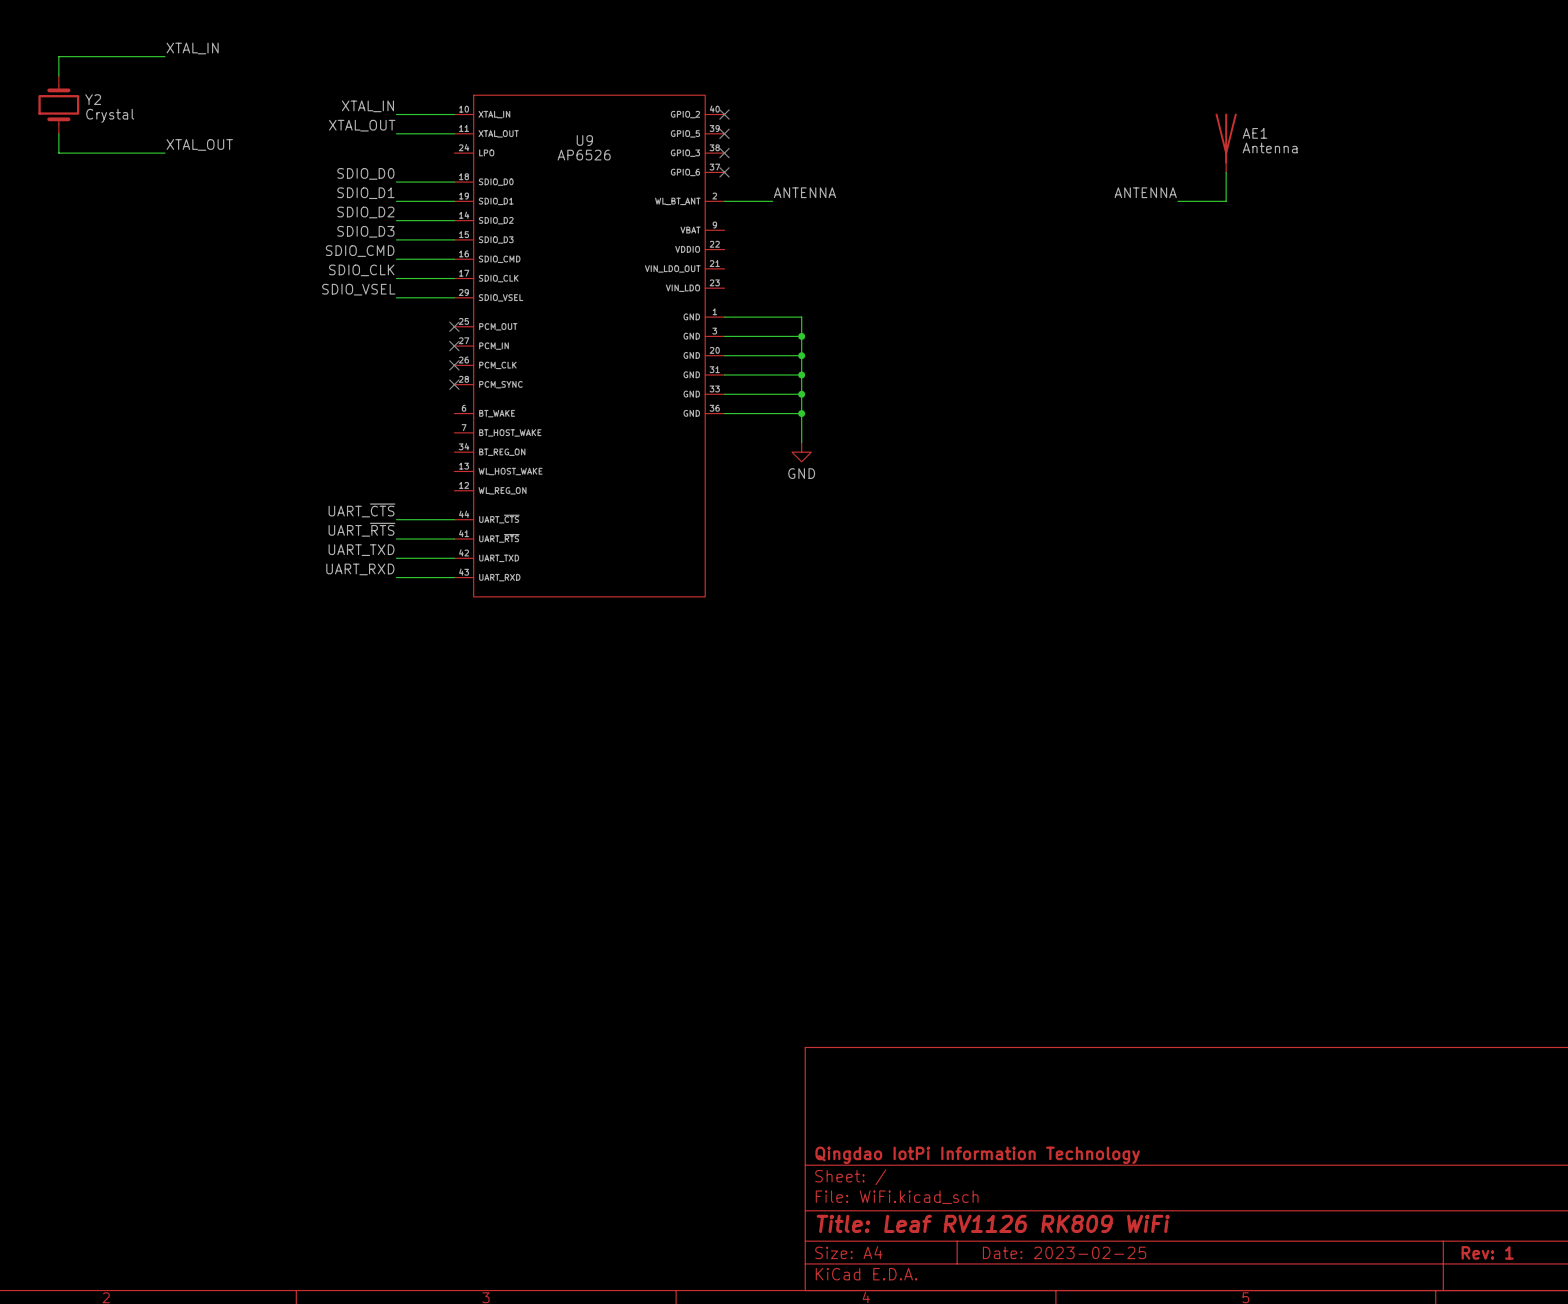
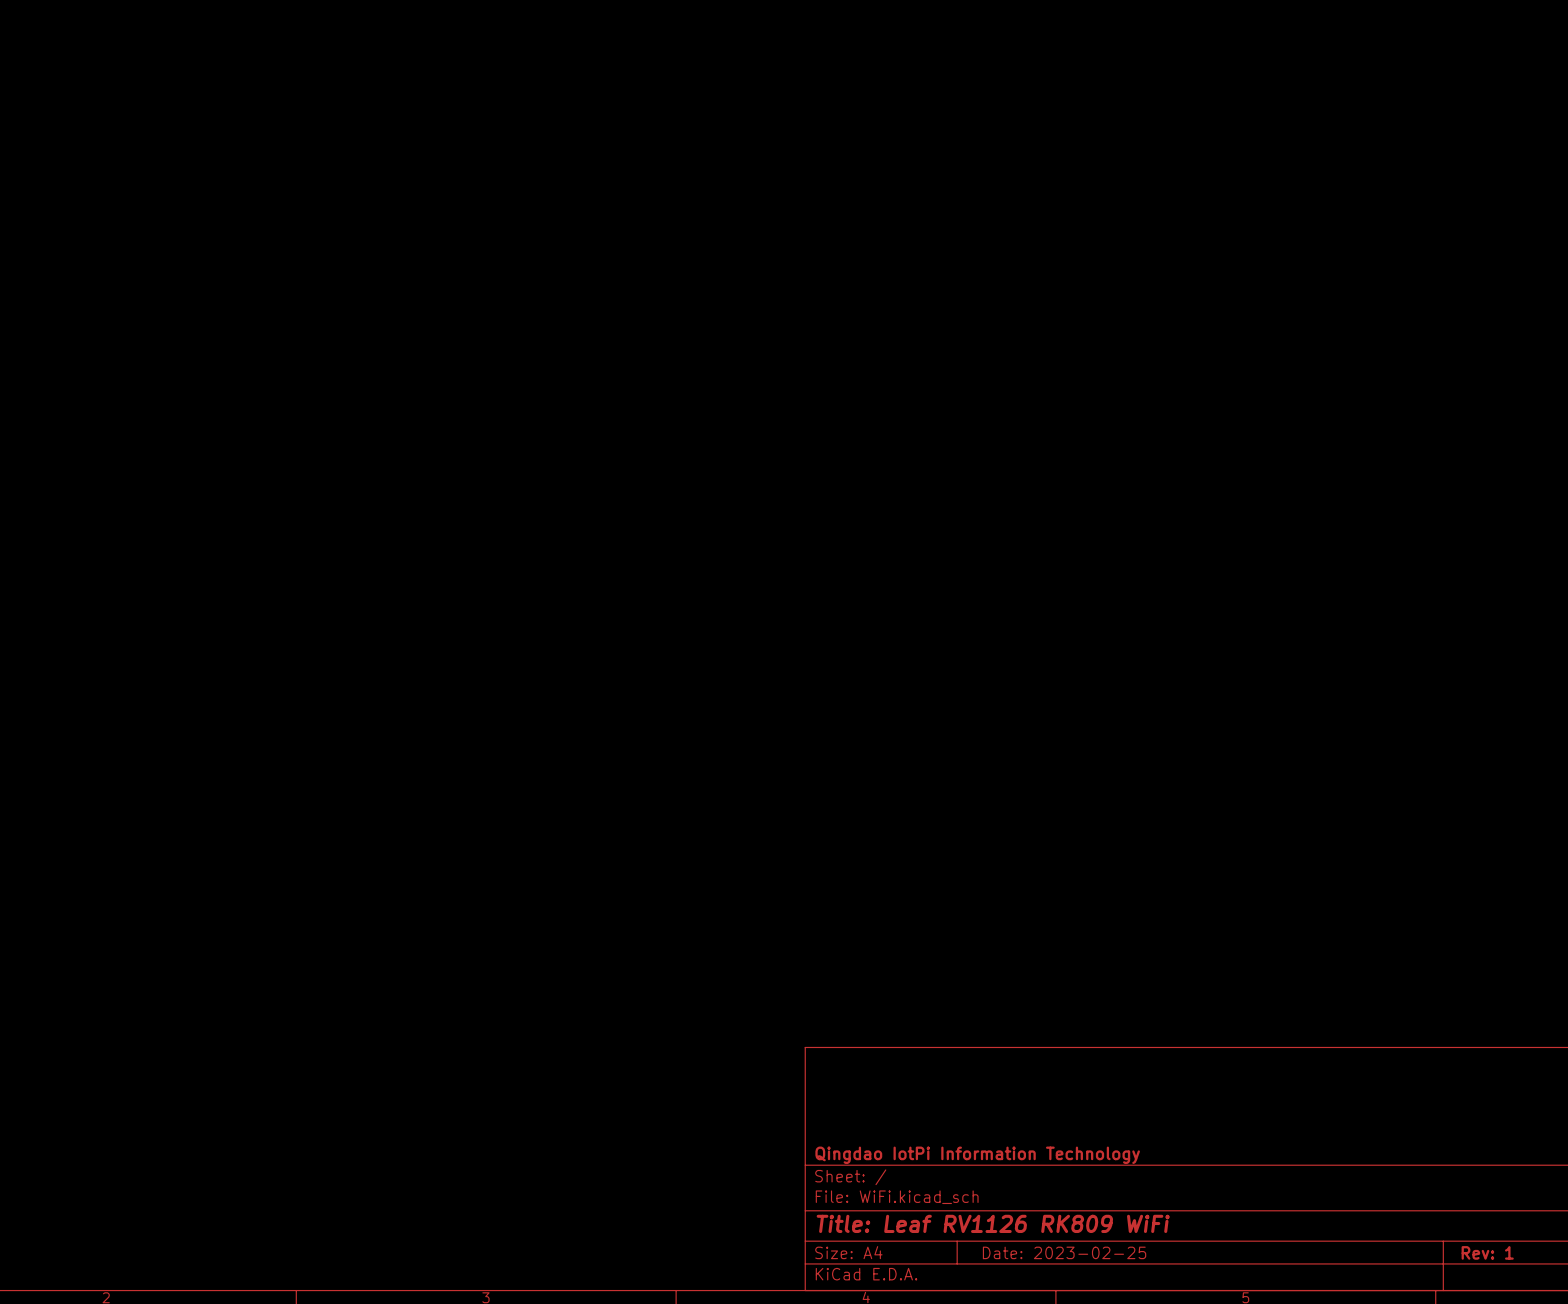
label: XTAL_IN (192, 48) -> none
wire: (164, 56) (58, 56) (58, 75) -> none
Y2: Crystal (58, 104) -> none
label: XTAL_IN (367, 106) -> none
wire: (396, 114) (454, 114) -> none
no-connect mark: (724, 114) -> none
label: XTAL_OUT (362, 125) -> none
wire: (58, 133) (58, 153) (164, 153) -> none
wire: (396, 133) (454, 133) -> none
no-connect mark: (724, 133) -> none
AE1: Antenna (1226, 142) -> none
label: XTAL_OUT (199, 144) -> none
no-connect mark: (724, 153) -> none
no-connect mark: (724, 172) -> none
wire: (1226, 172) (1226, 201) (1177, 201) -> none
label: SDIO_D0 (365, 173) -> none
wire: (396, 182) (454, 182) -> none
label: ANTENNA (804, 192) -> none
label: ANTENNA (1145, 192) -> none
label: SDIO_D1 (365, 193) -> none
wire: (396, 201) (454, 201) -> none
wire: (724, 201) (772, 201) -> none
label: SDIO_D2 (365, 212) -> none
wire: (396, 220) (454, 220) -> none
label: SDIO_D3 (365, 231) -> none
wire: (396, 239) (454, 239) -> none
label: SDIO_CMD (360, 251) -> none
wire: (396, 259) (454, 259) -> none
label: SDIO_CLK (361, 270) -> none
wire: (396, 278) (454, 278) -> none
label: SDIO_VSEL (358, 289) -> none
wire: (396, 297) (454, 297) -> none
wire: (724, 317) (801, 317) (801, 442) -> none
no-connect mark: (454, 326) -> none
wire: (724, 336) (801, 336) -> none
junction: (801, 336) -> none
no-connect mark: (454, 346) -> none
U9: AP6526 (589, 346) -> none
wire: (724, 355) (801, 355) -> none
junction: (801, 355) -> none
no-connect mark: (454, 365) -> none
wire: (724, 374) (801, 374) -> none
junction: (801, 374) -> none
no-connect mark: (454, 384) -> none
wire: (724, 394) (801, 394) -> none
junction: (801, 394) -> none
wire: (724, 413) (801, 413) -> none
junction: (801, 413) -> none
power symbol: GND (801, 452) -> none
label: UART_~{CTS} (361, 510) -> none
wire: (396, 519) (454, 519) -> none
label: UART_~{RTS} (361, 529) -> none
wire: (396, 538) (454, 538) -> none
label: UART_TXD (361, 550) -> none
wire: (396, 558) (454, 558) -> none
label: UART_RXD (360, 569) -> none
wire: (396, 577) (454, 577) -> none

